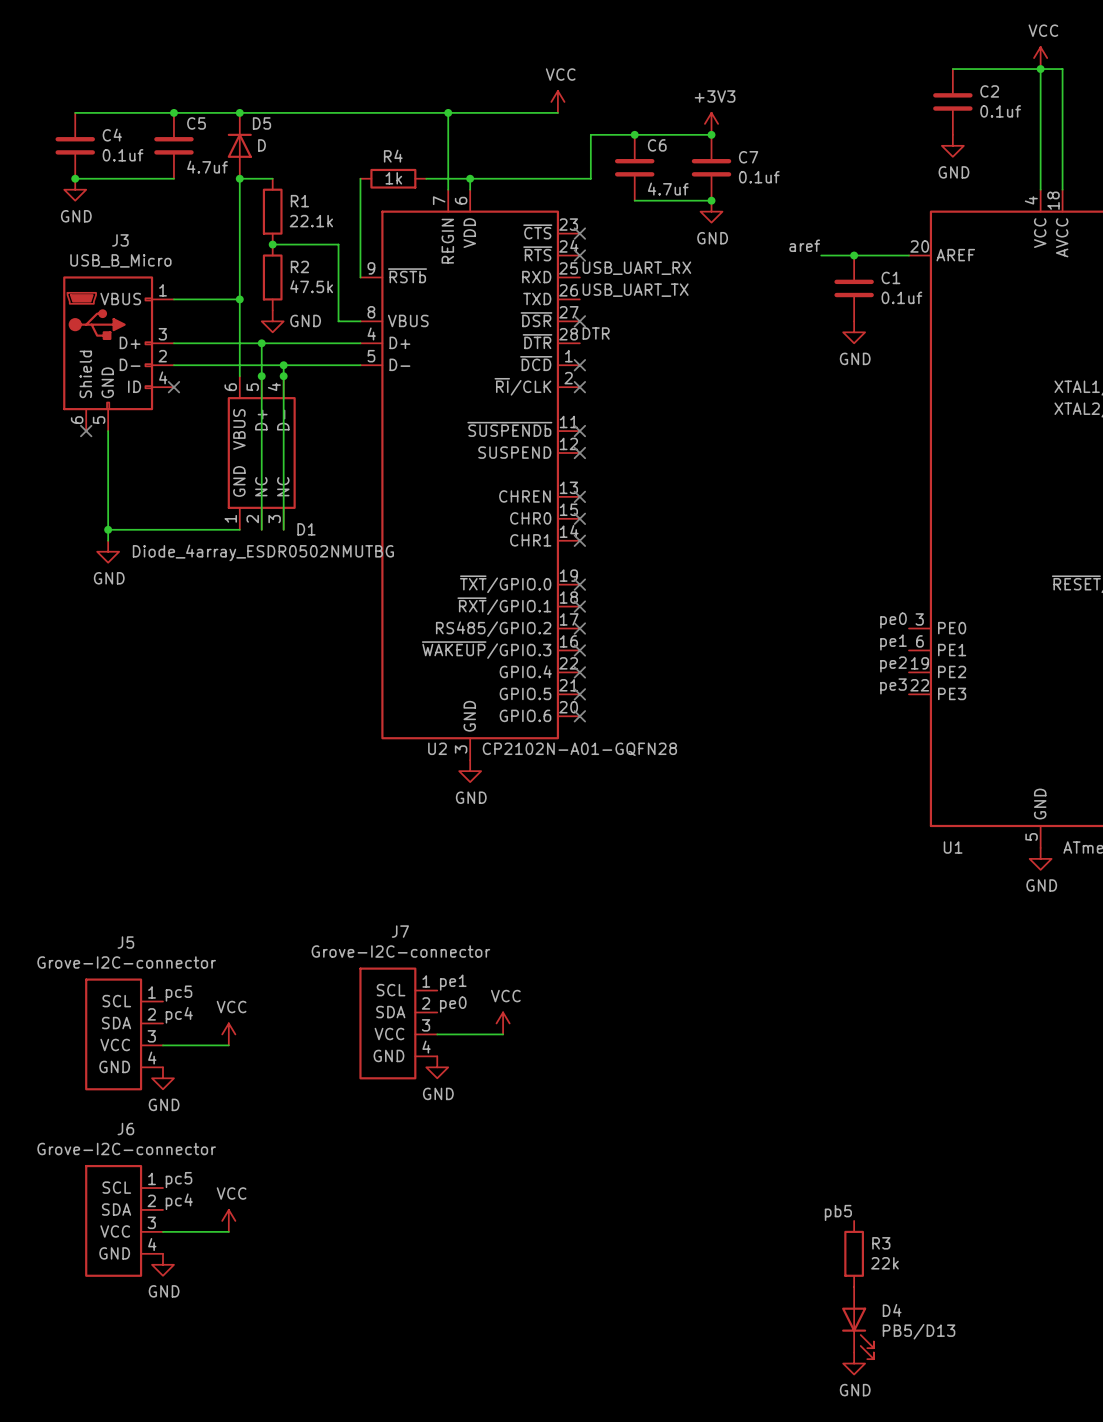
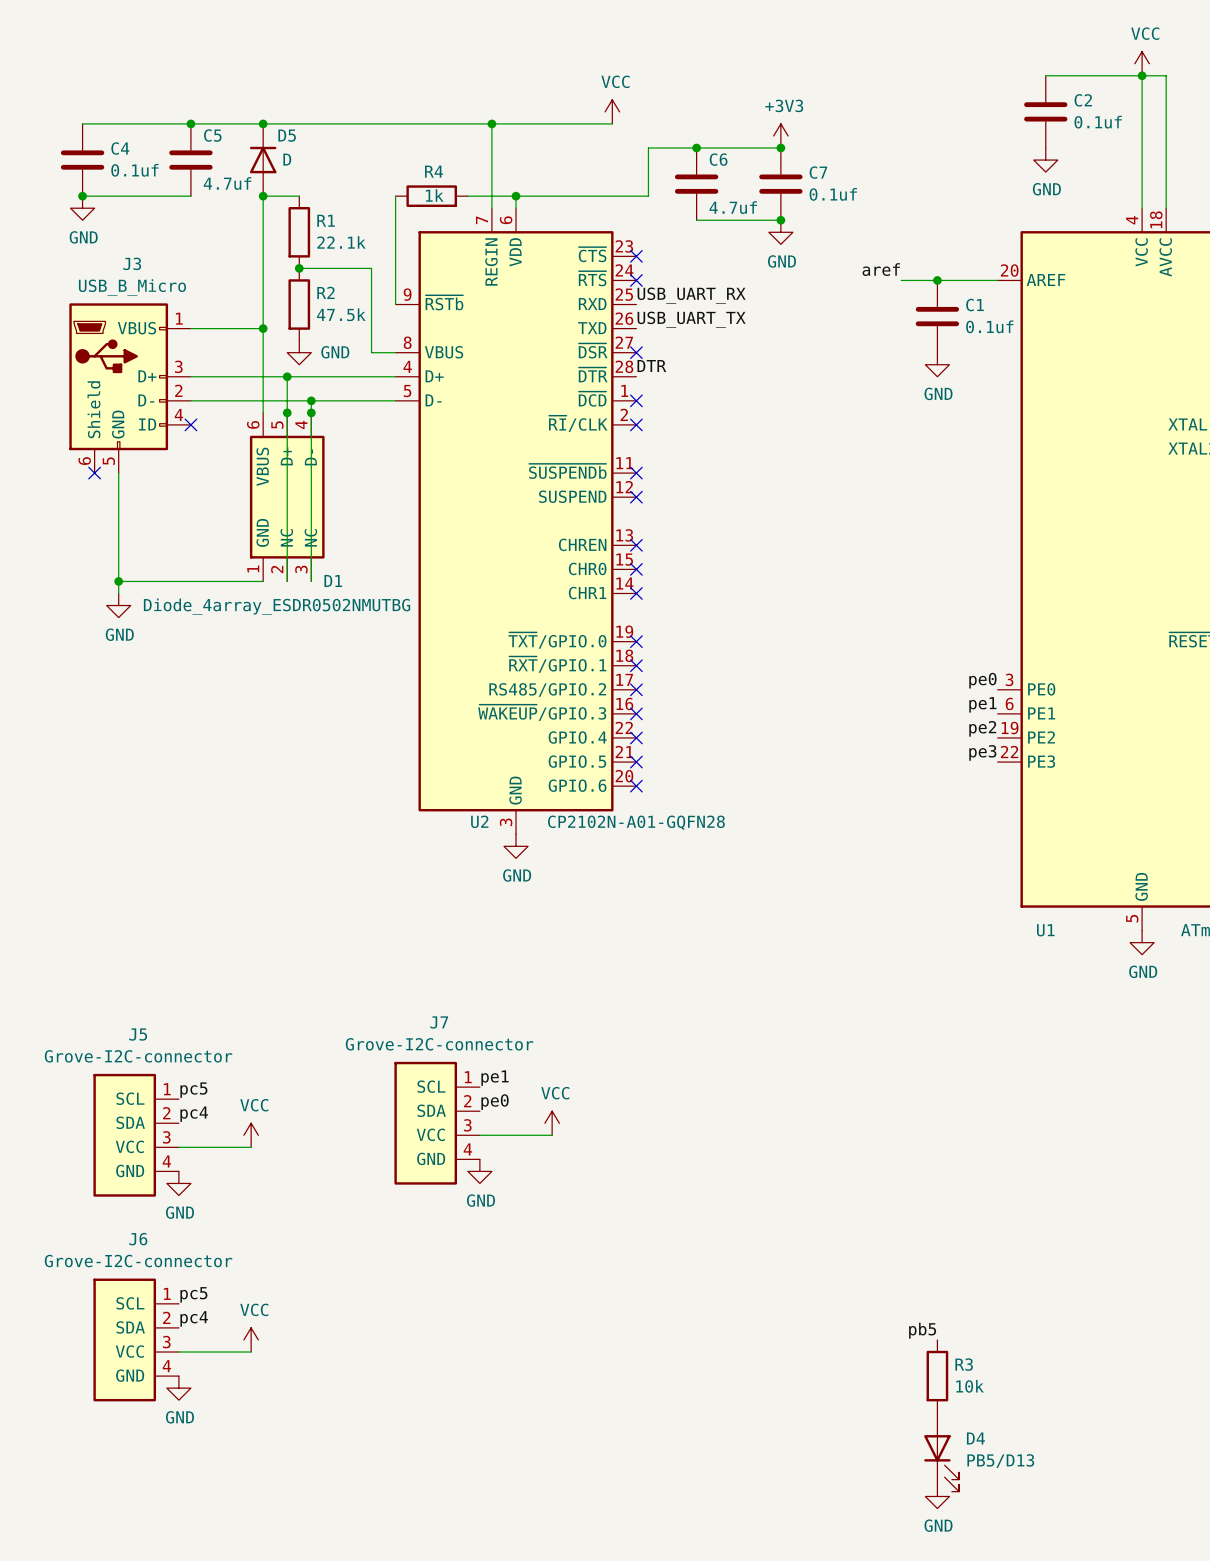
R3 value: 22k (884, 1263) -> 10k (970, 1386)

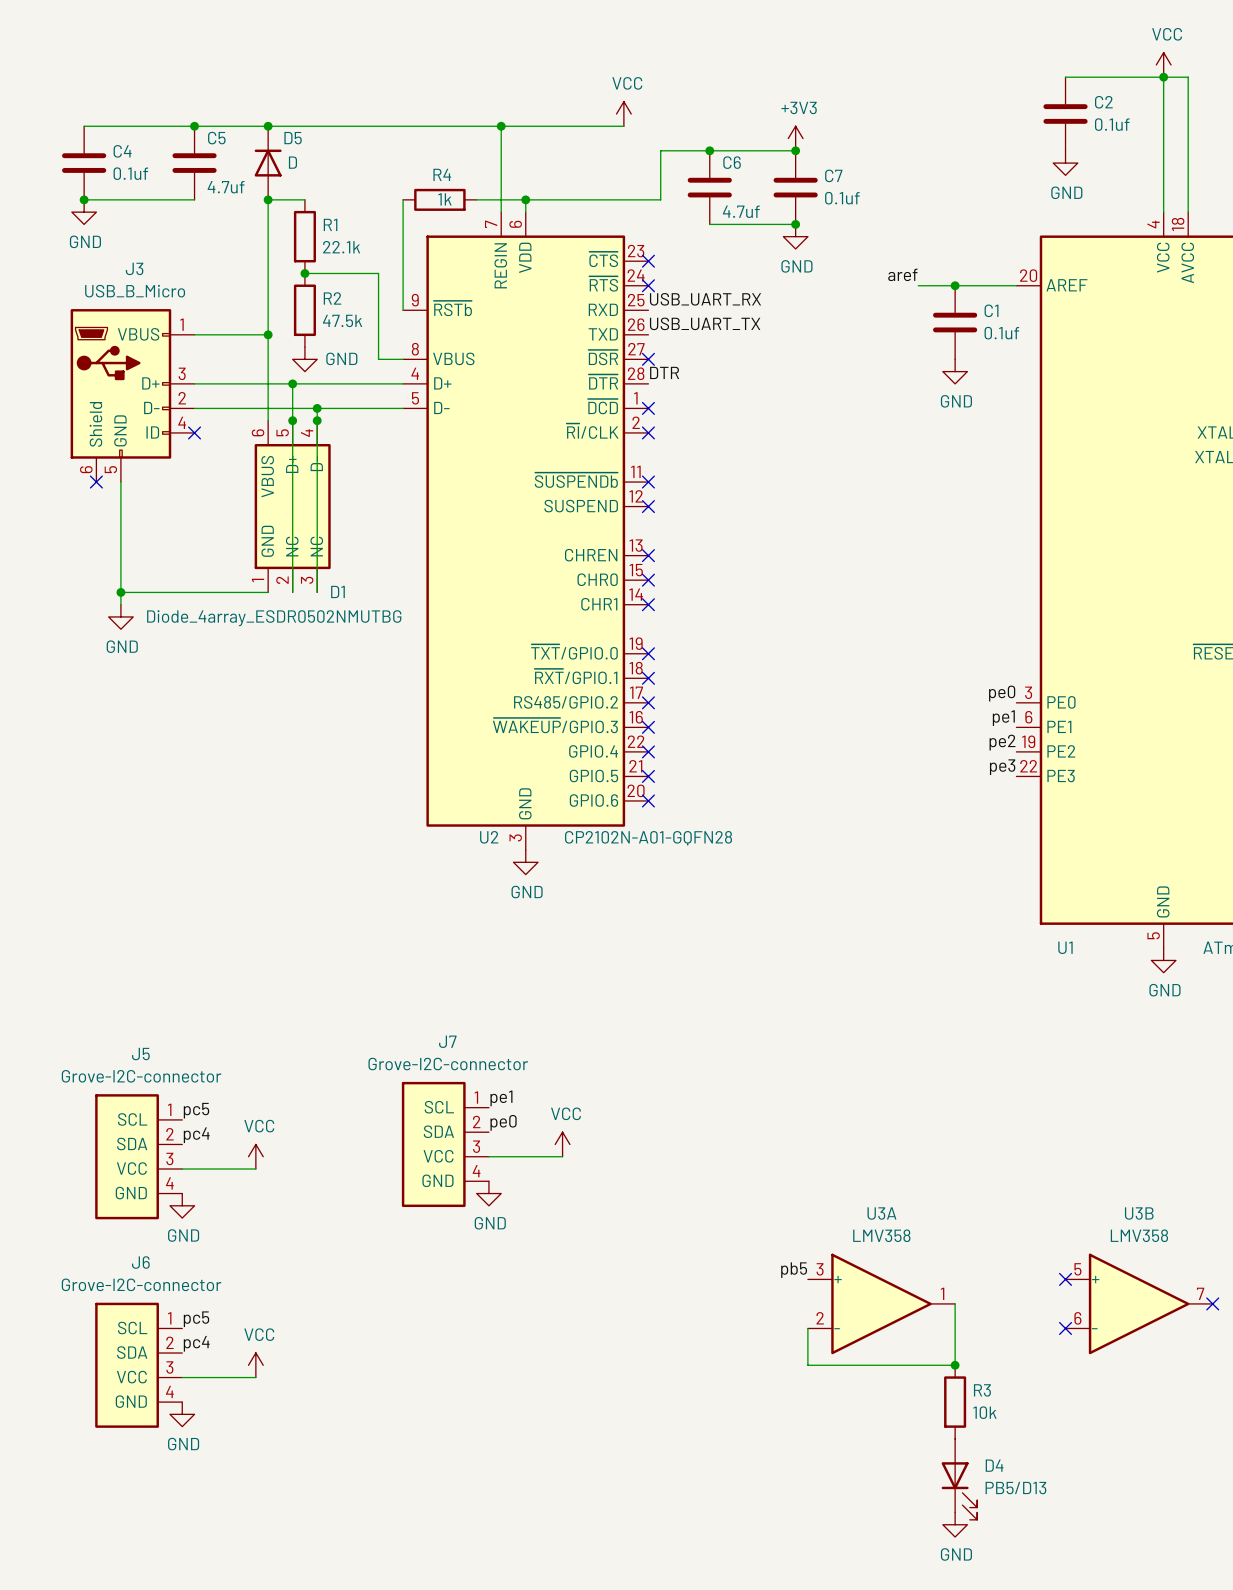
no-connect mark: none -> (1065, 1279)
U3A: none -> LMV358 (881, 1303)
wire: none -> (955, 1303) (955, 1365) (807, 1365) (807, 1328)
U3B: none -> LMV358 (1139, 1303)
no-connect mark: none -> (1212, 1303)
no-connect mark: none -> (1065, 1328)
label position: pb5 (922, 1330) -> pb5 (794, 1270)
junction: none -> (955, 1365)

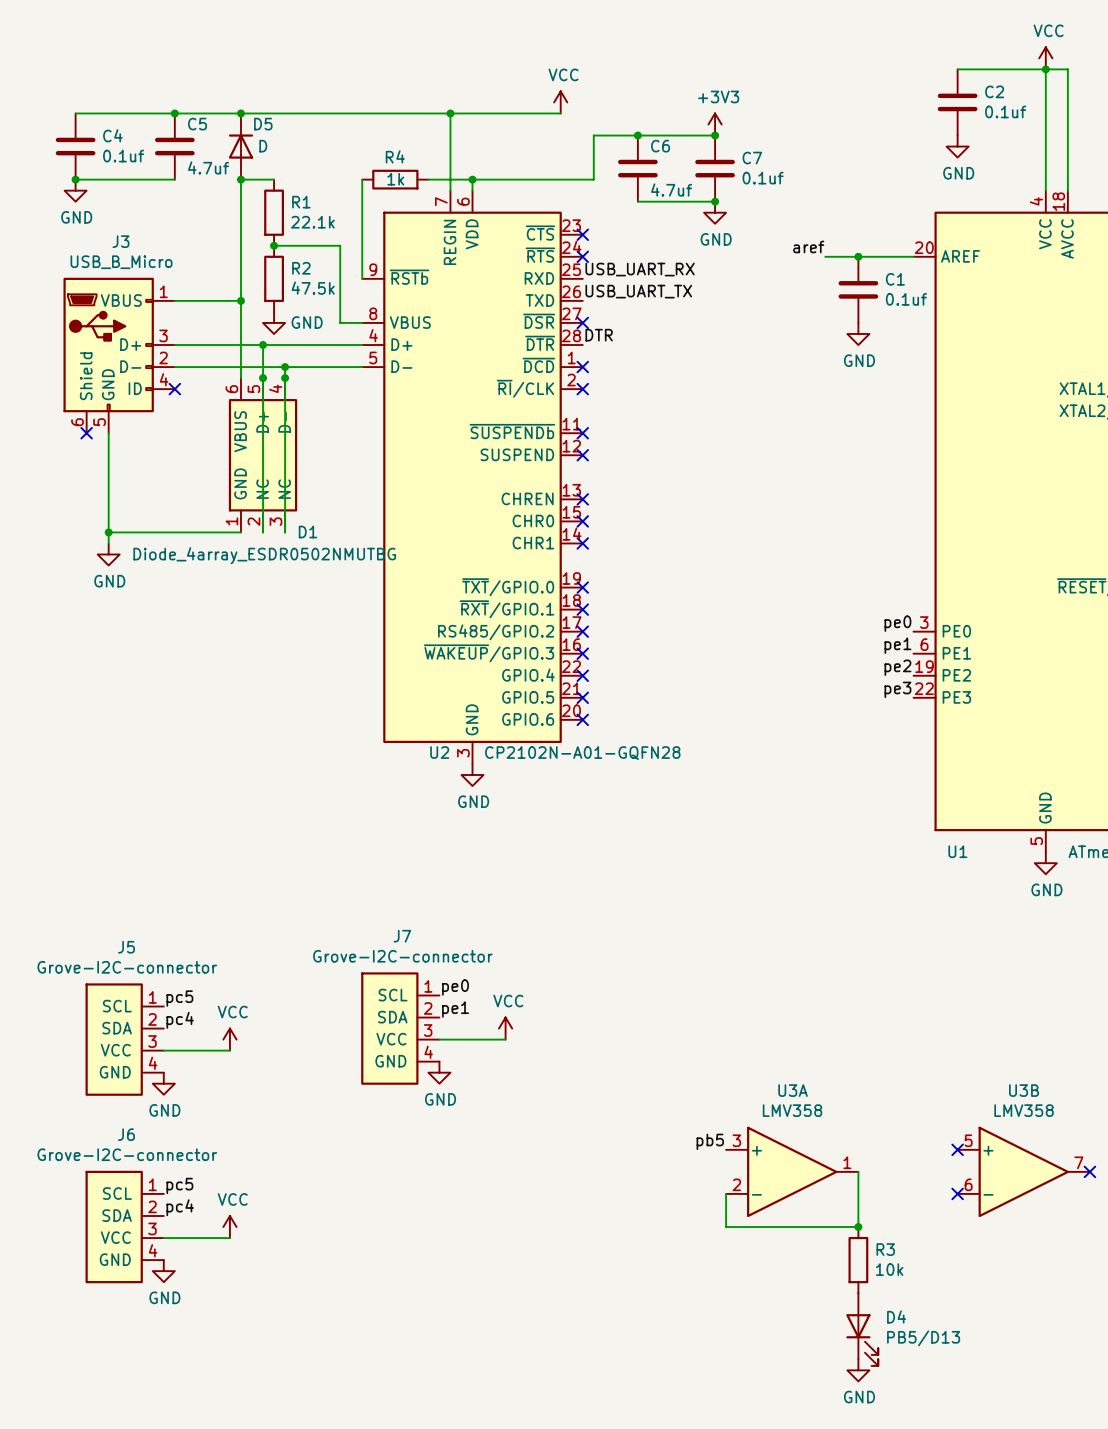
label: pe1 (501, 1098) -> pe0 (455, 987)
label: pe0 (503, 1122) -> pe1 (455, 1009)

